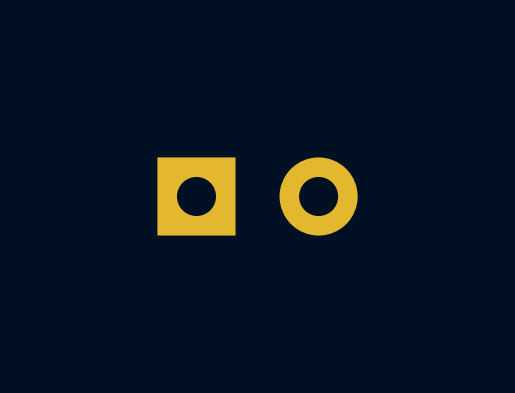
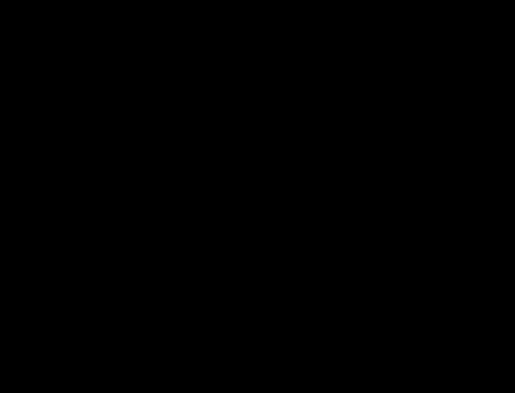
part: (257, 196) -> none

